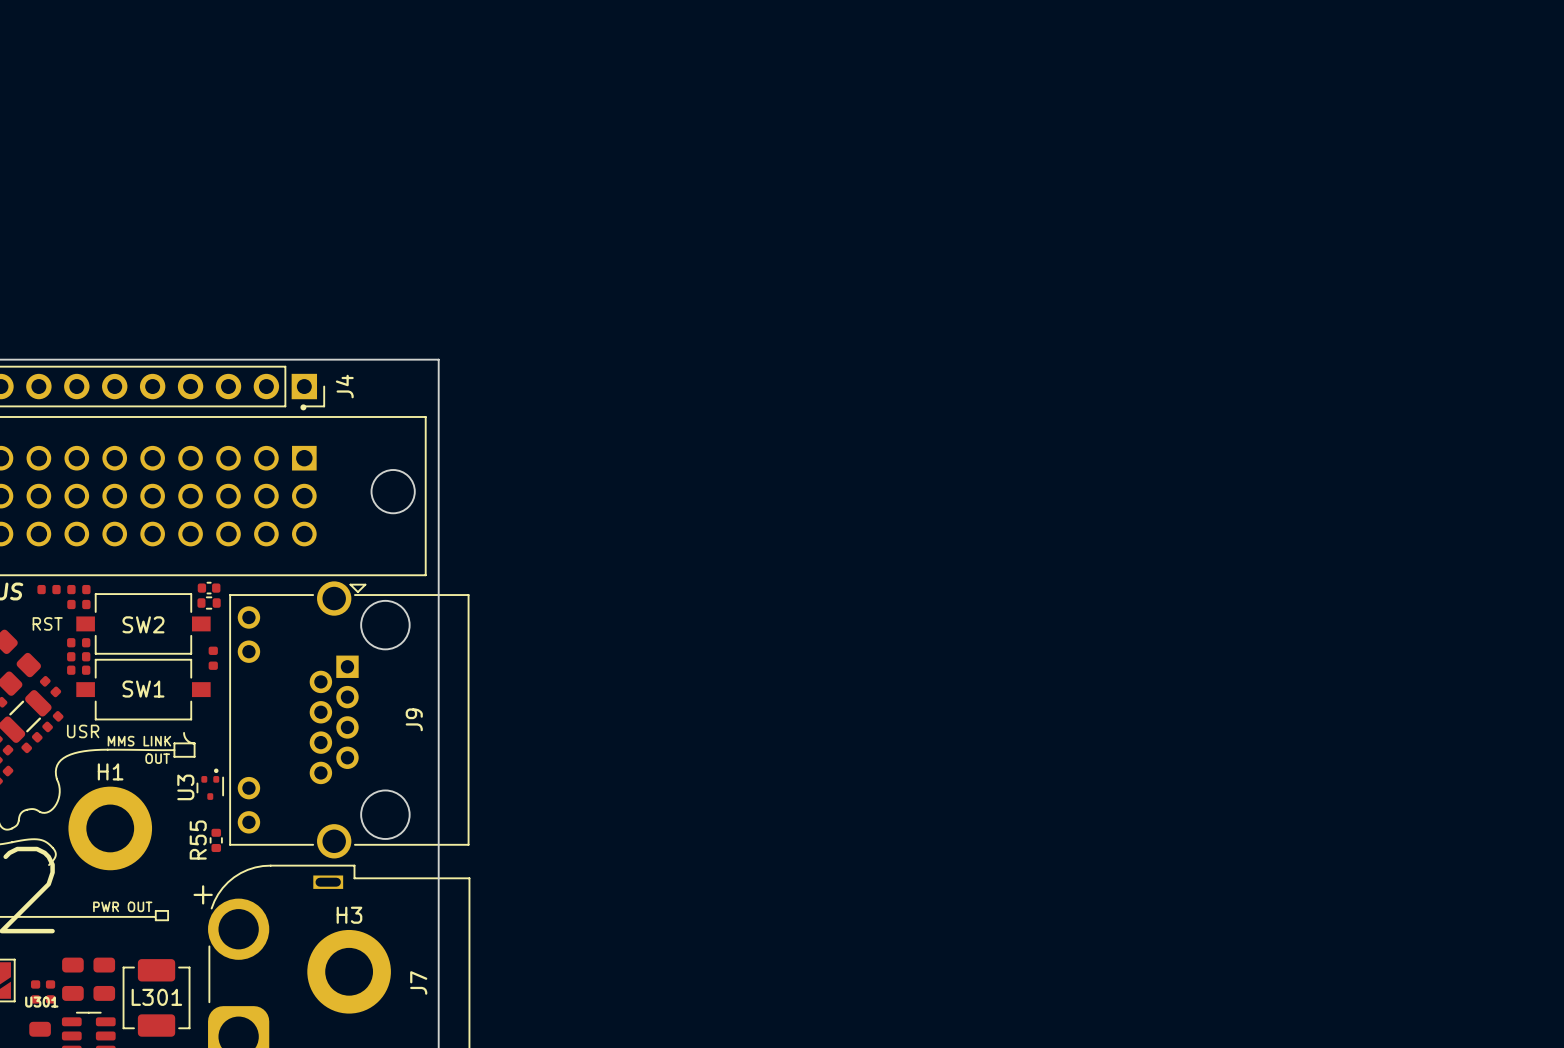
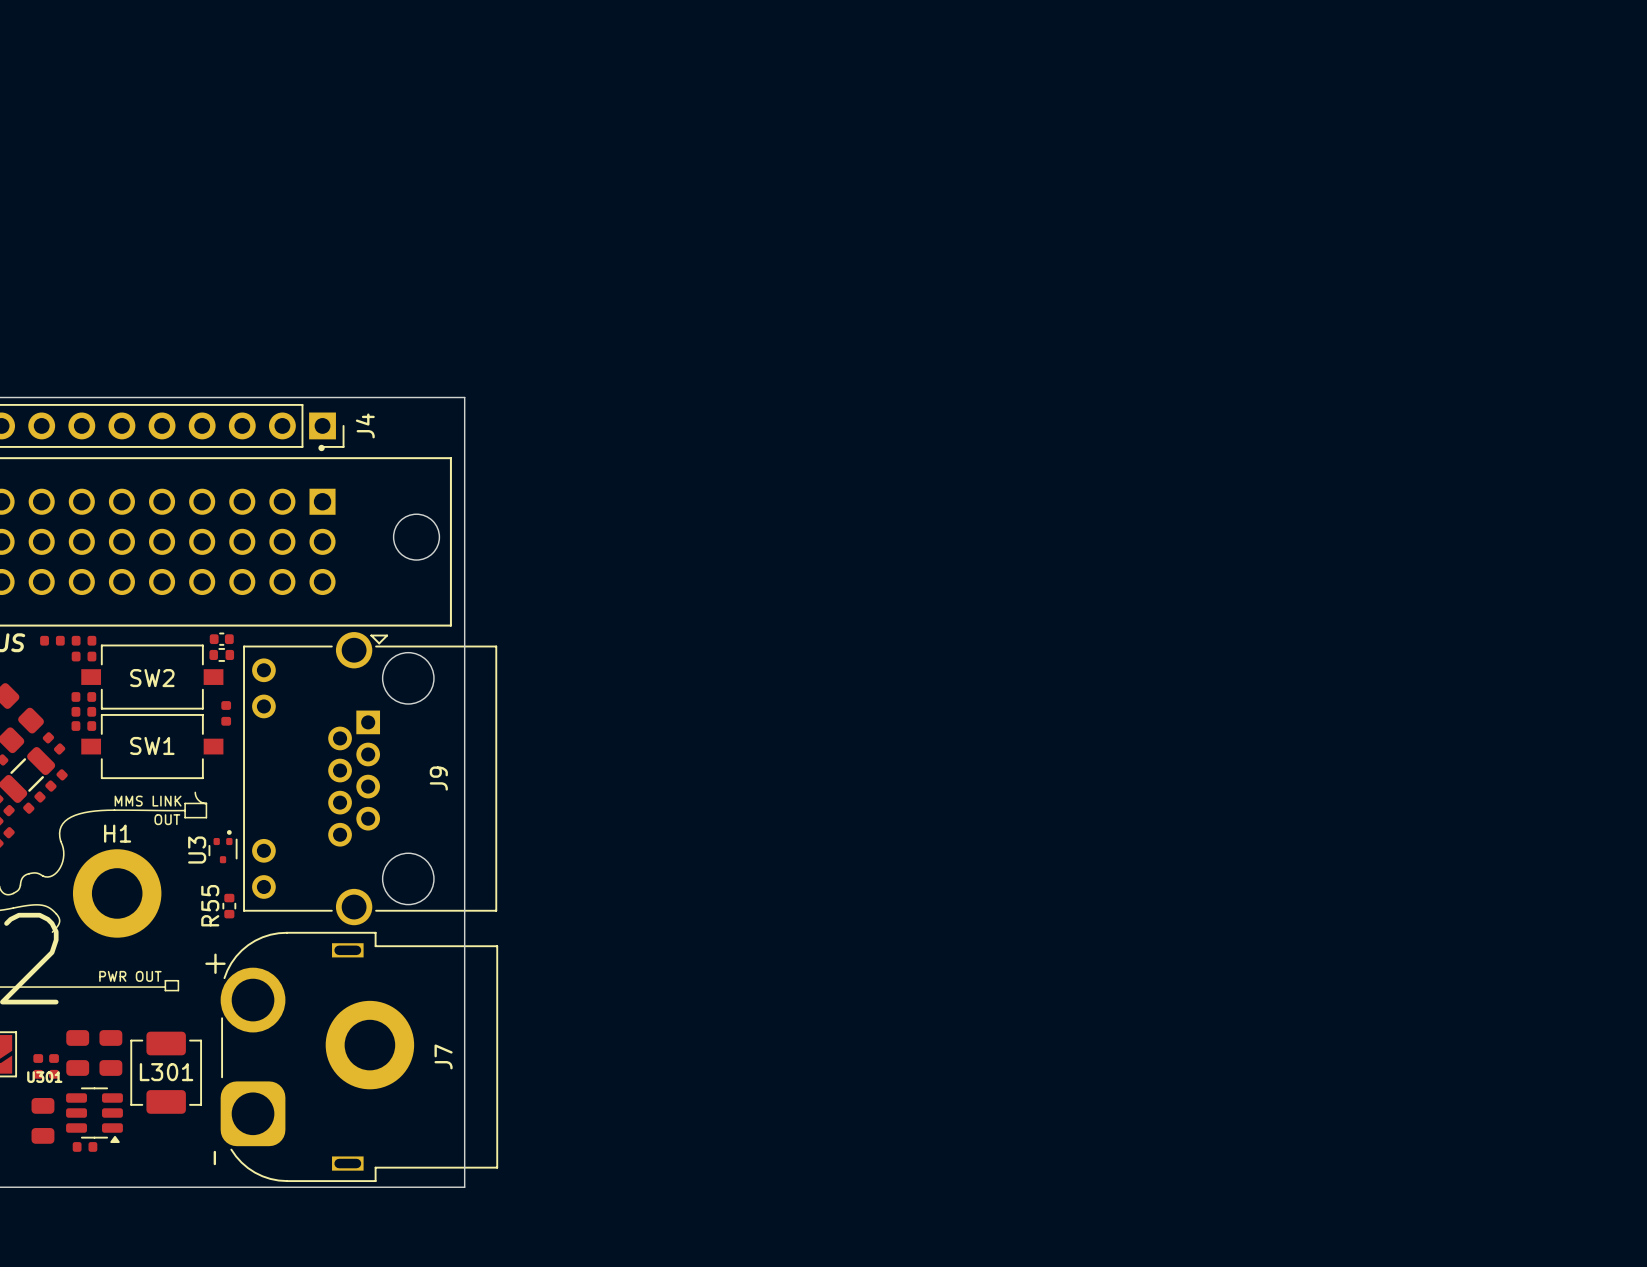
text: RST (47, 623) -> none
text: USR (83, 731) -> none
H3 name: H3 (349, 915) -> none

